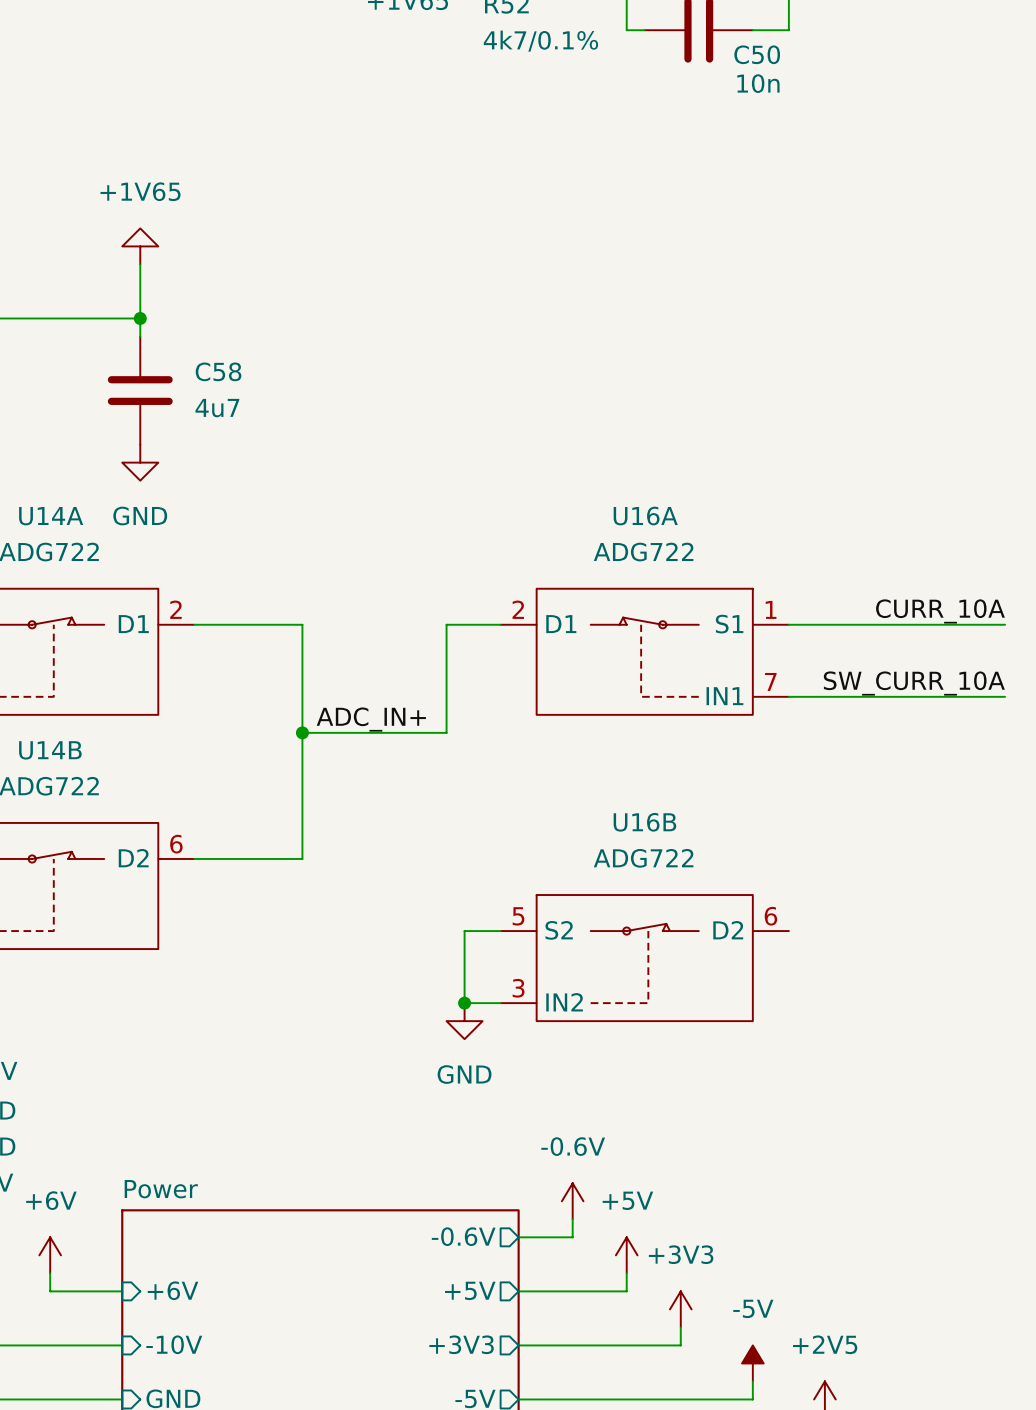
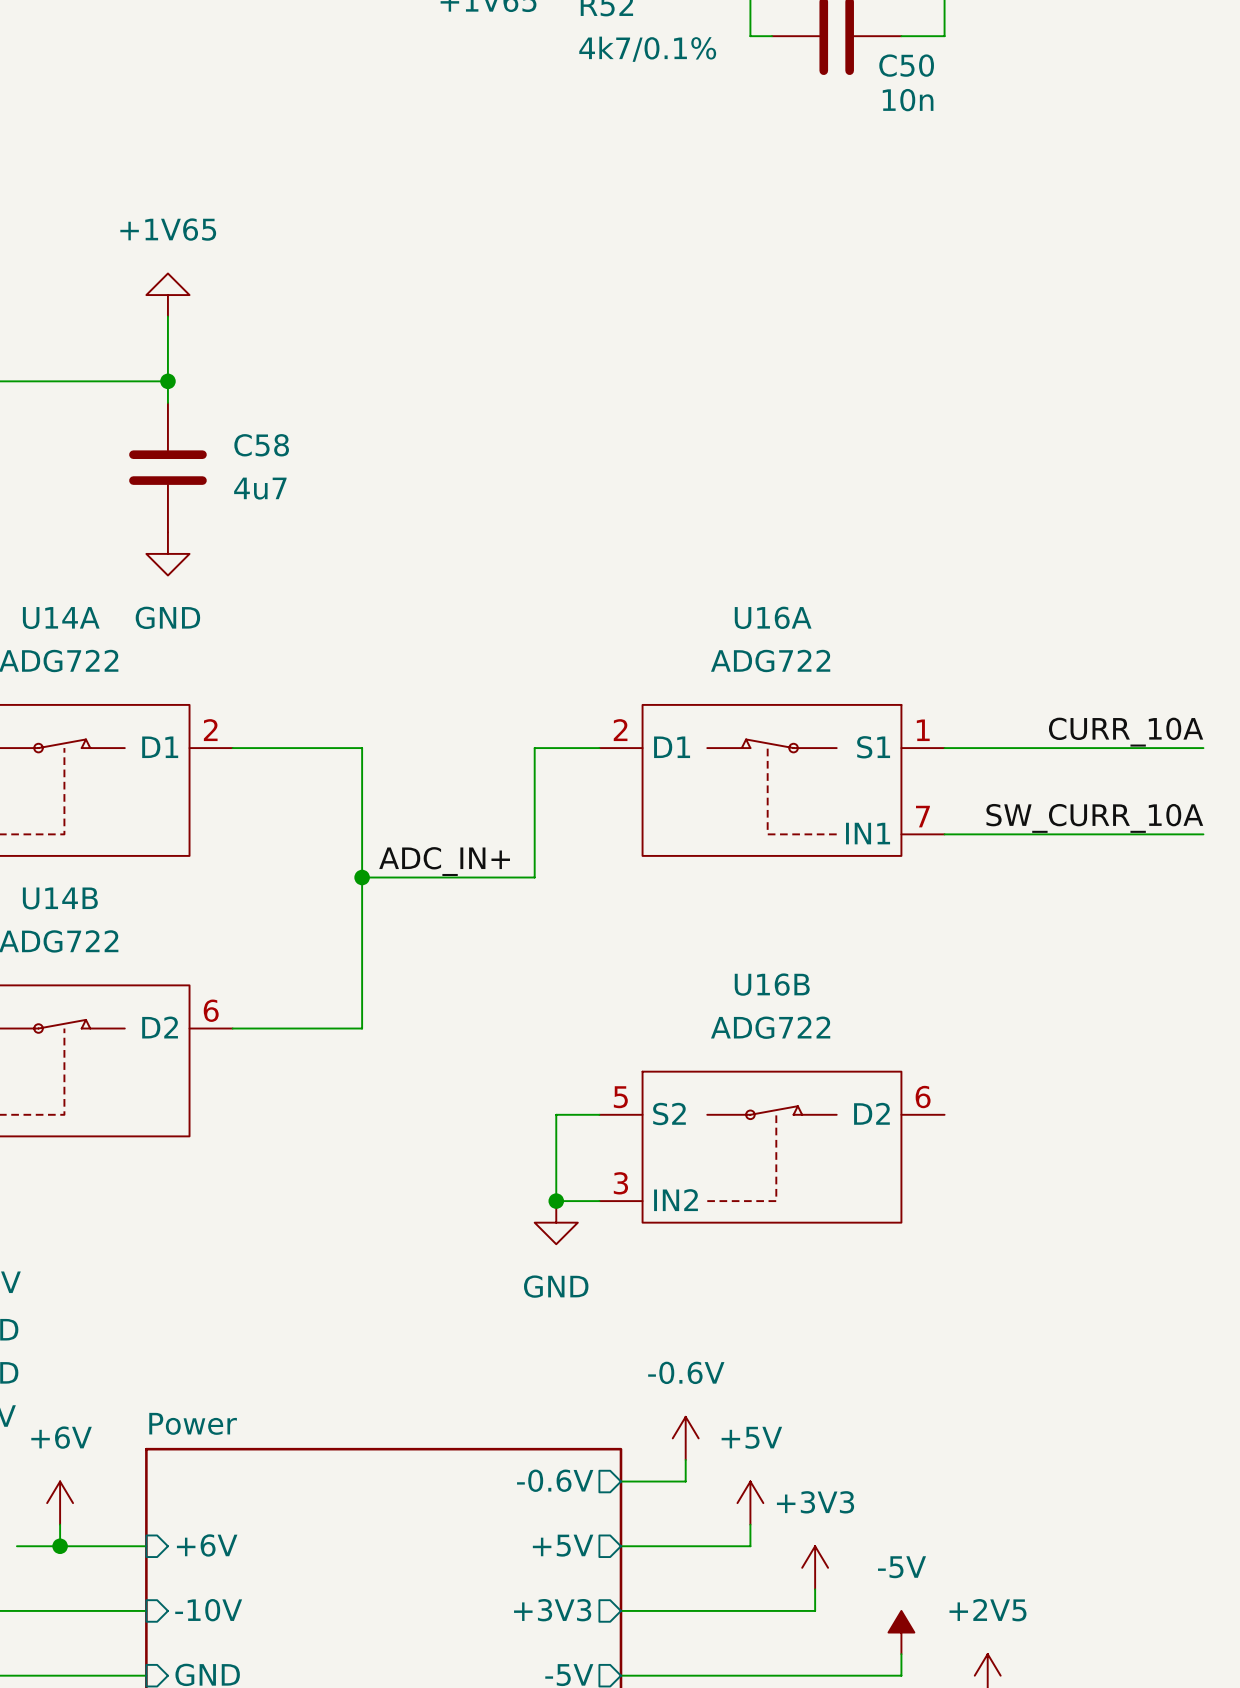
wire: none -> (16, 1546) (60, 1546)
junction: none -> (60, 1546)

